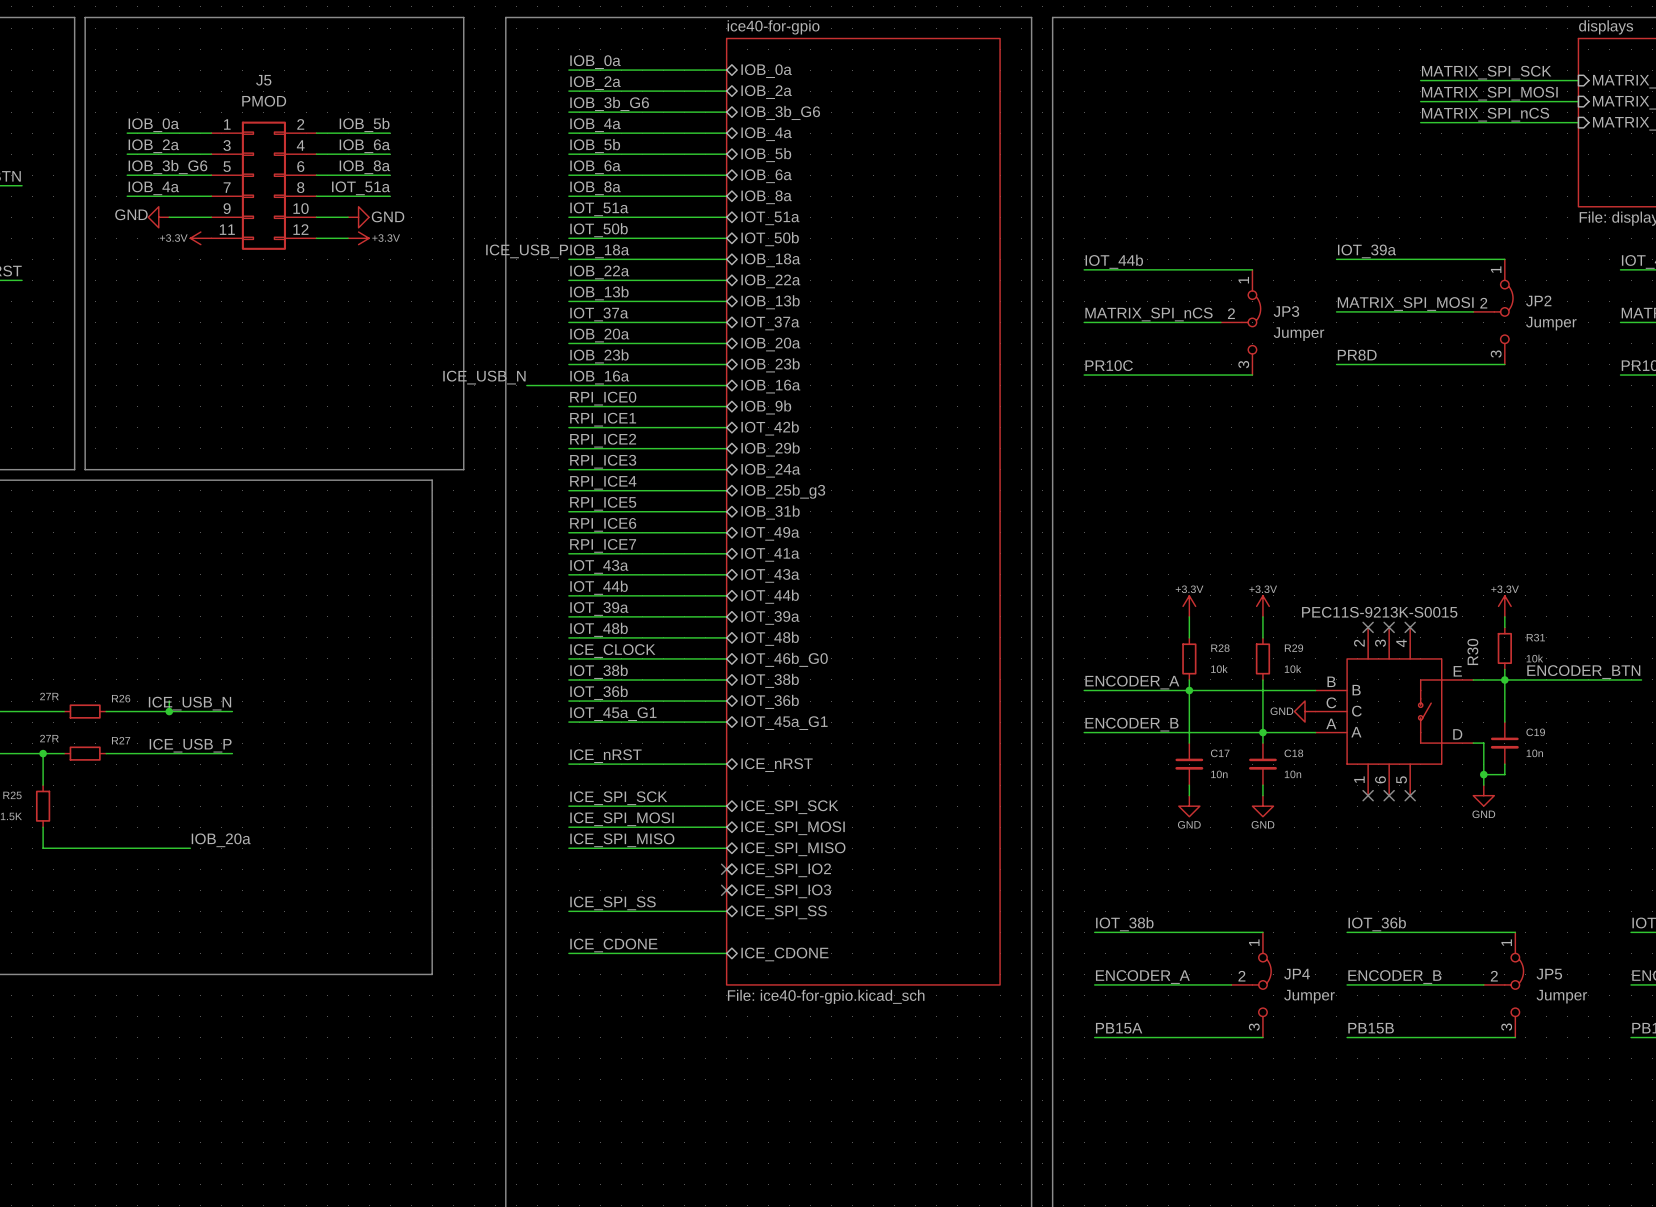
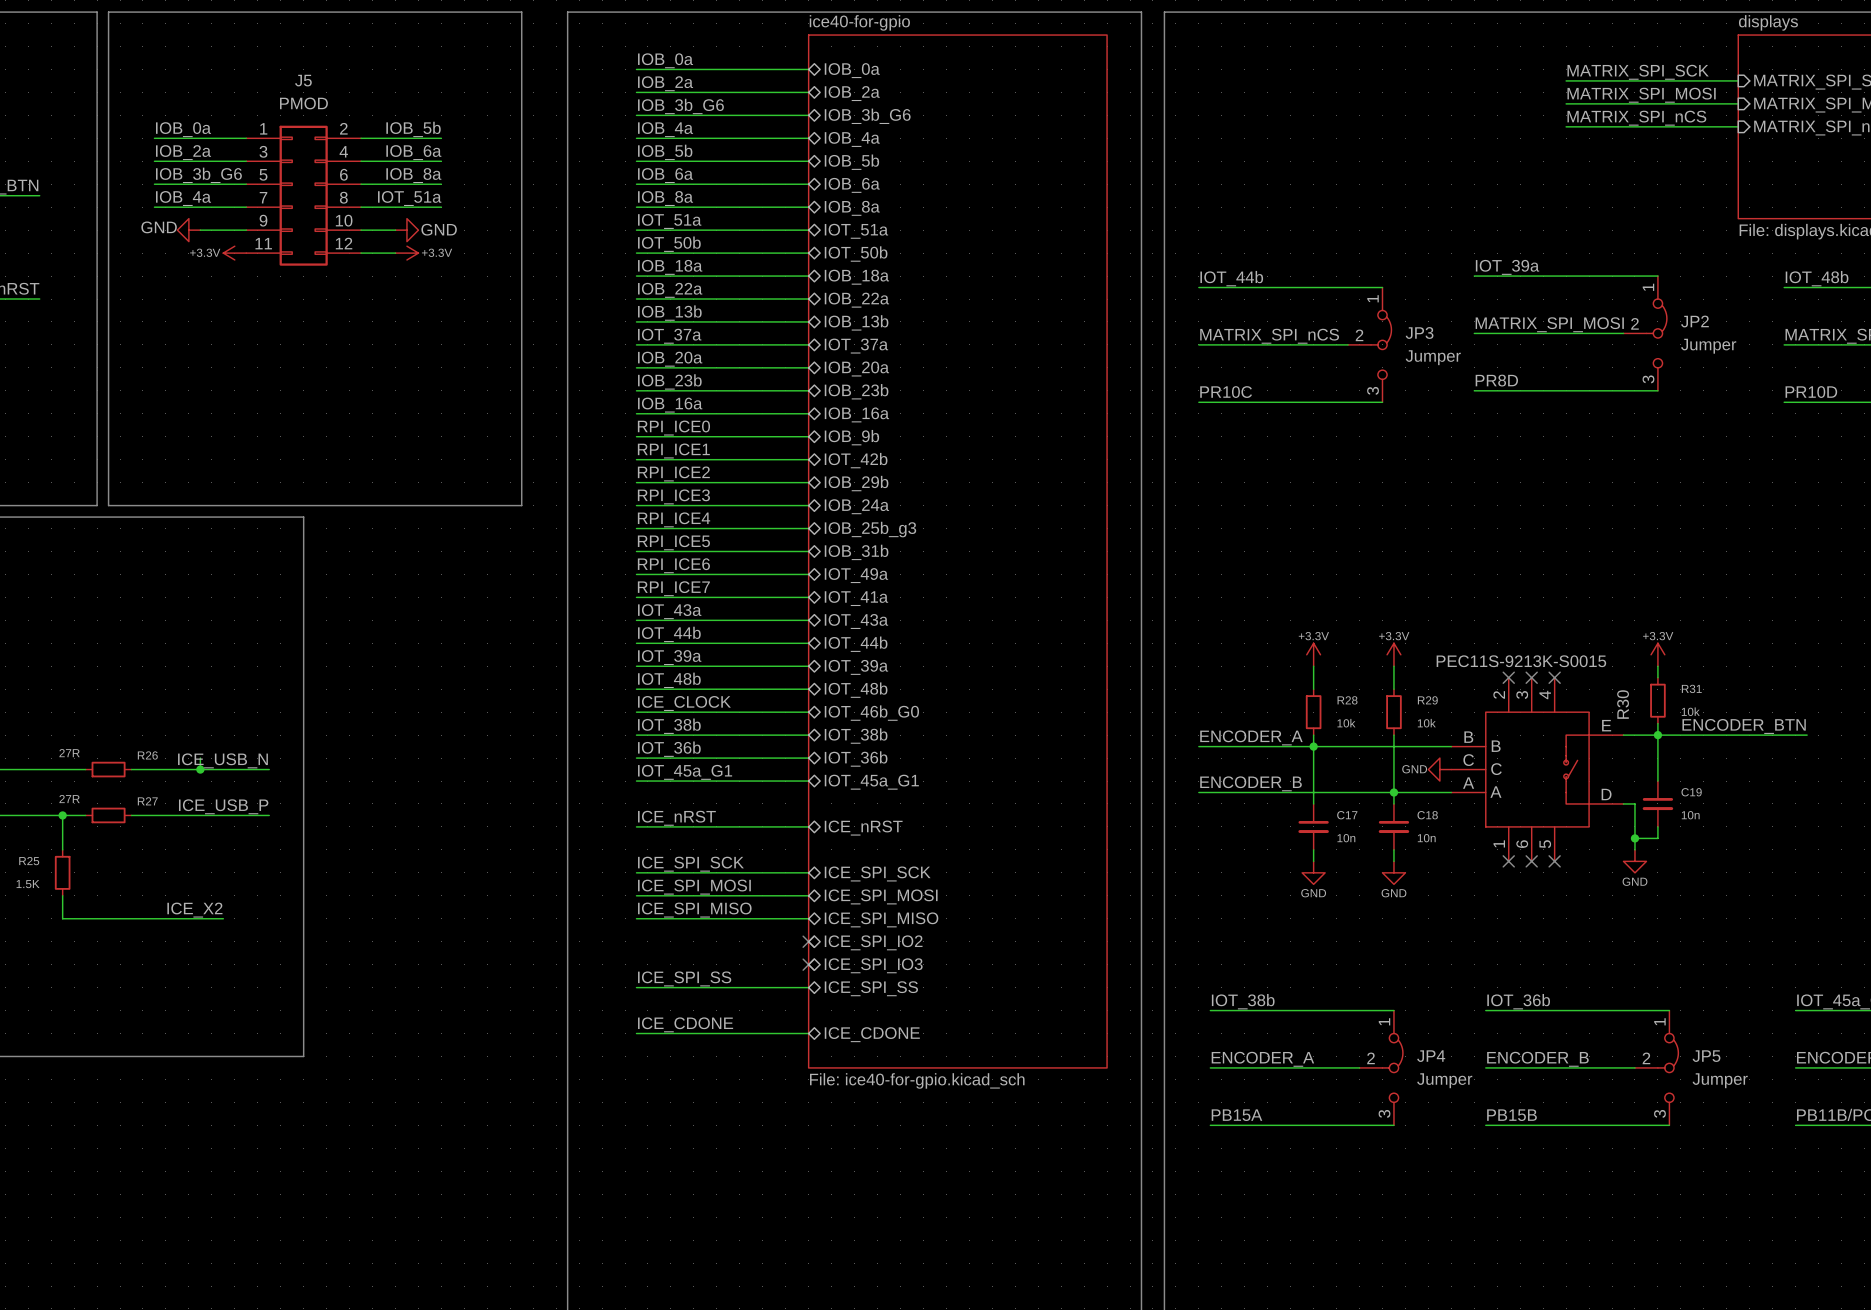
label: ICE_USB_P (527, 251) -> none
label: ICE_USB_N (484, 377) -> none
wire: (526, 385) (568, 385) -> none
line: (263, 480) (432, 480) (432, 974) (263, 974) -> (303, 517) (303, 1056)
label: IOB_20a (221, 840) -> ICE_X2 (194, 910)

